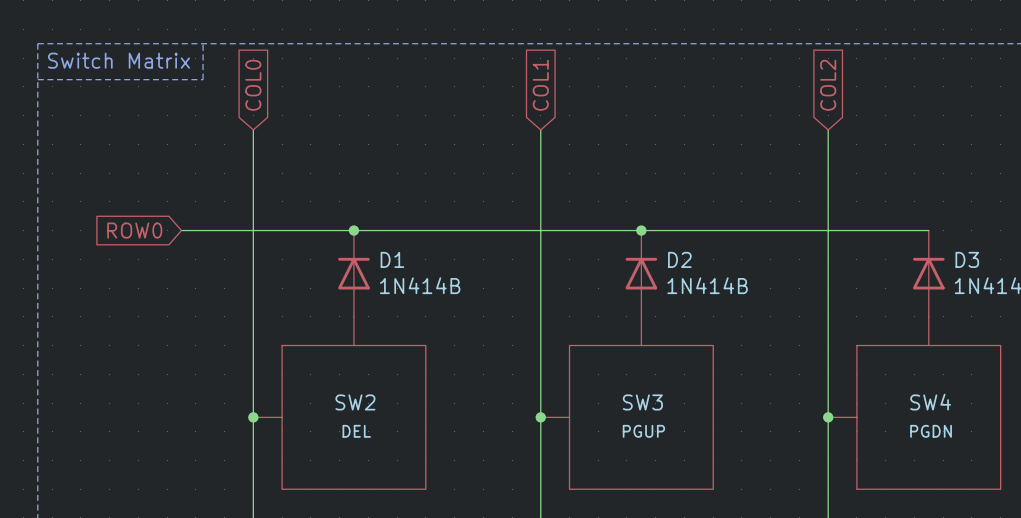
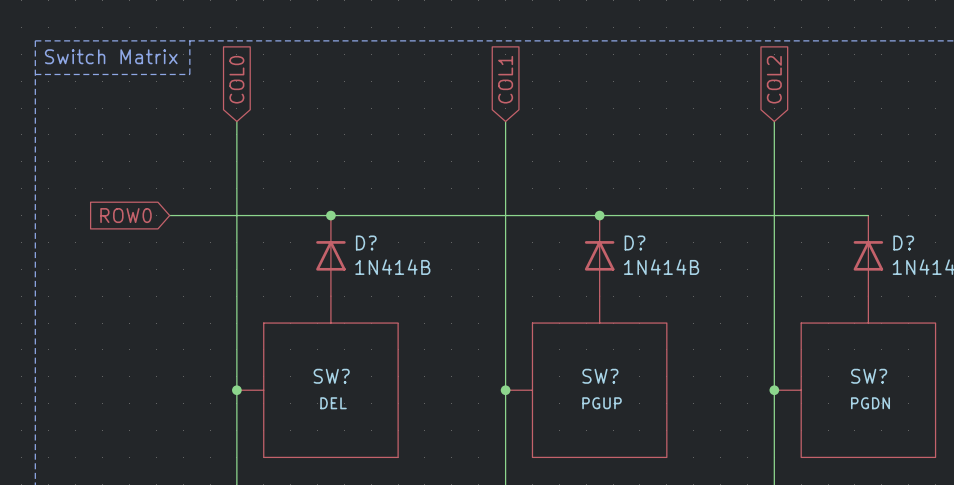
D1 name: D1 (392, 259) -> D? (366, 242)
D2 name: D2 (679, 259) -> D? (635, 242)
D3 name: D3 (967, 259) -> D? (903, 242)
SW2 name: SW2 (355, 402) -> SW? (331, 376)
SW3 name: SW3 (642, 402) -> SW? (600, 376)
SW4 name: SW4 (930, 402) -> SW? (869, 376)

